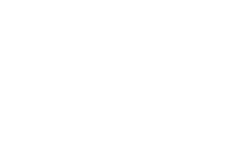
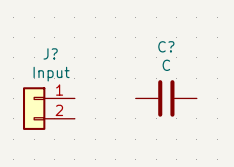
C?: none -> C (166, 98)
J?: none -> Input (48, 108)

